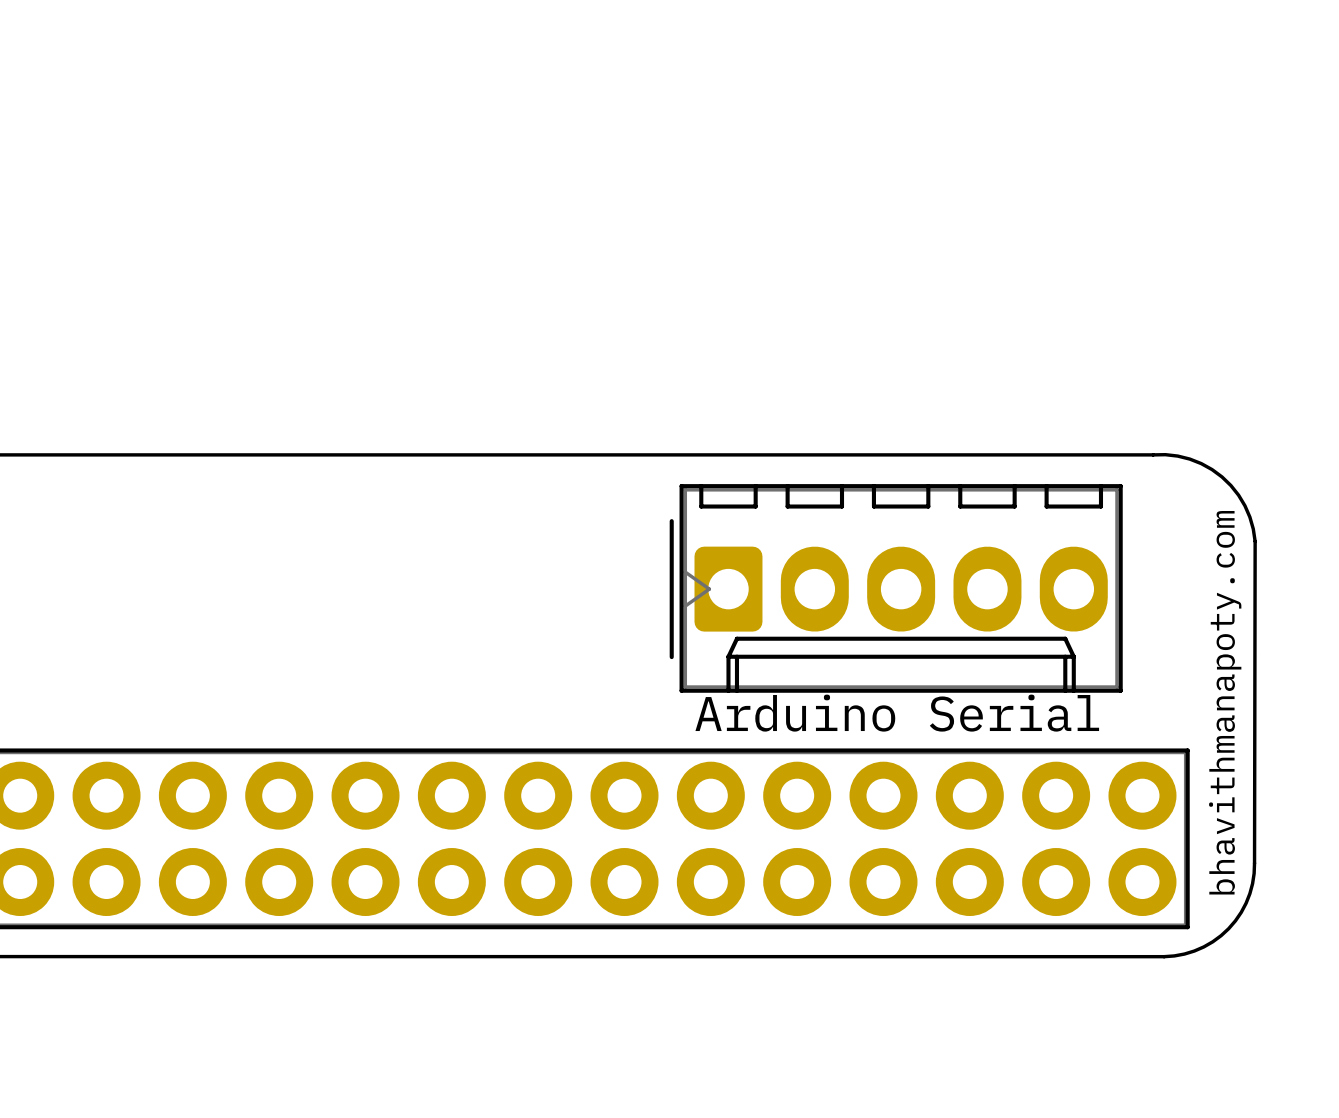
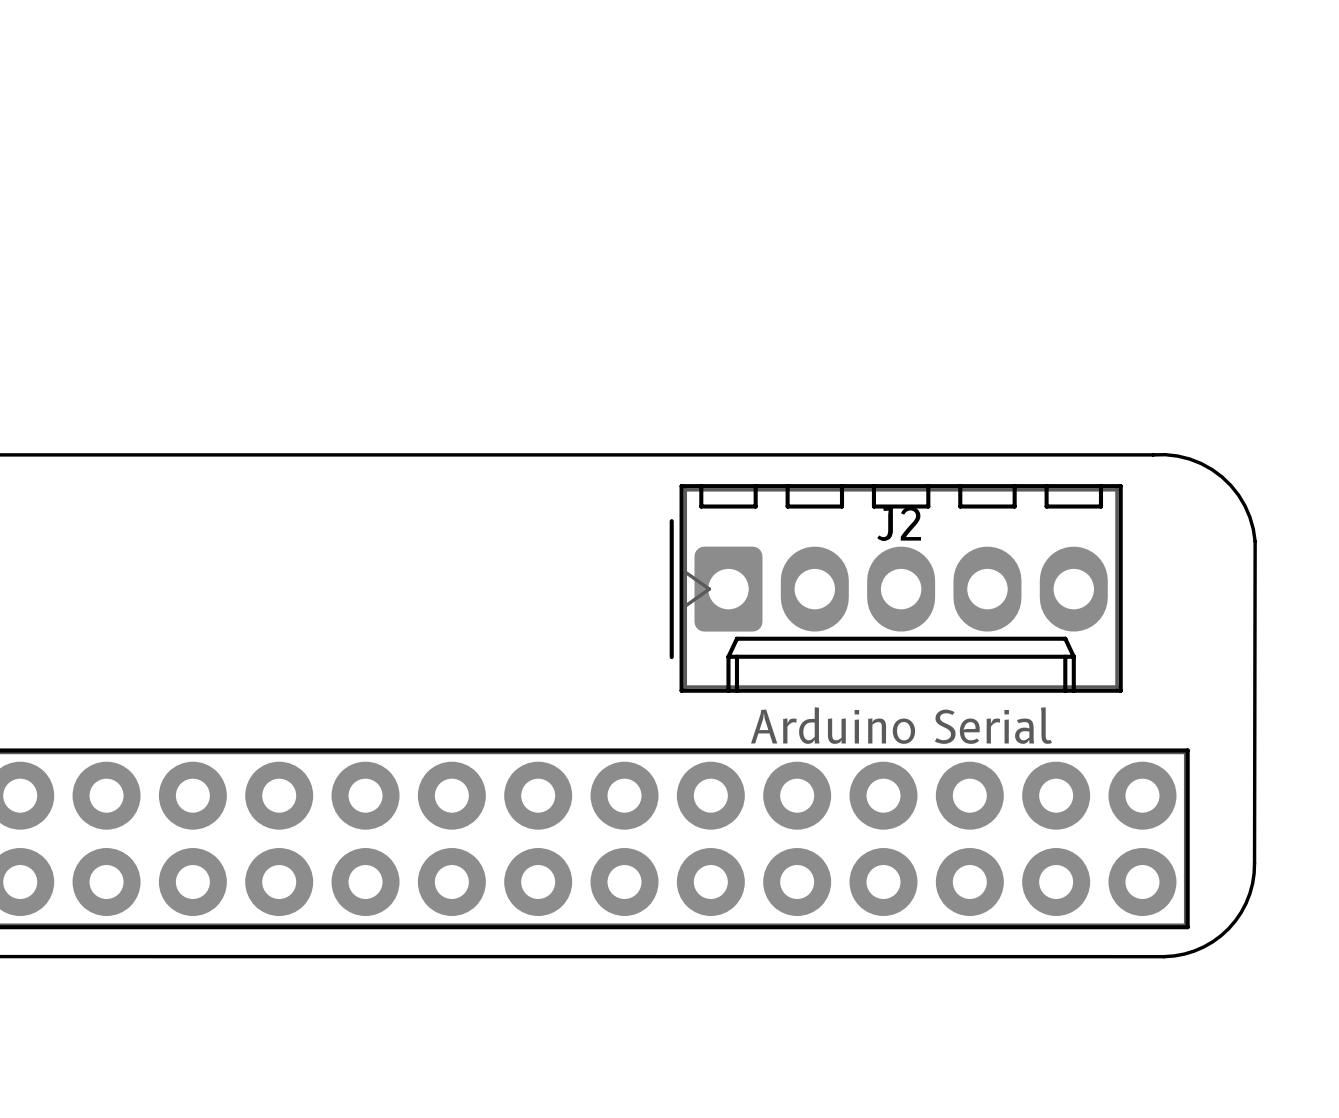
J2 name: none -> J2 (899, 523)
text: bhavithmanapoty.com (1225, 702) -> none
text: Arduino Serial (897, 713) -> none
J2 value: none -> Arduino Serial (901, 725)

